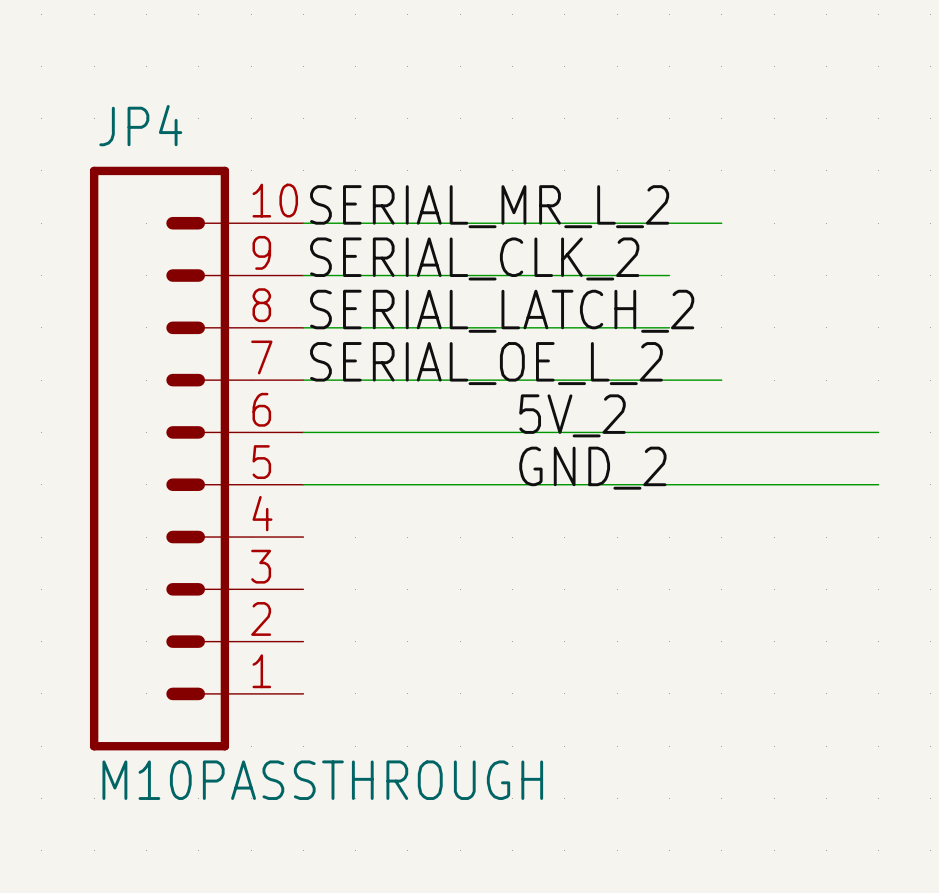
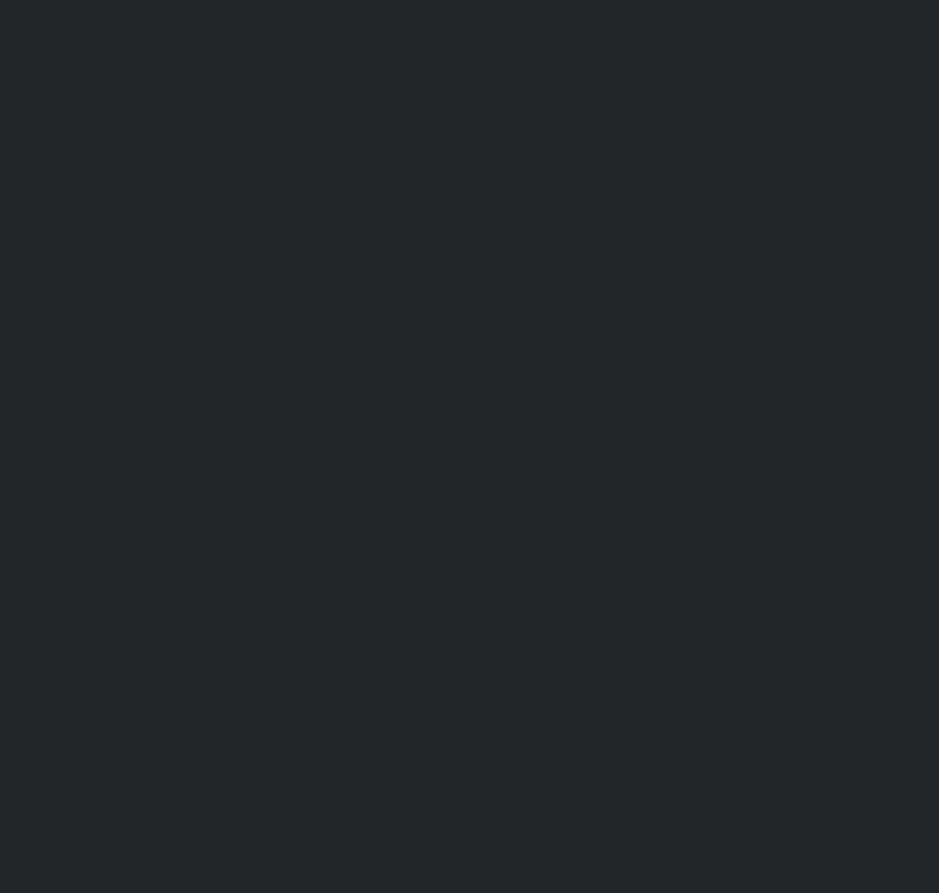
label: SERIAL_MR_L_2 (489, 206) -> none
wire: (303, 223) (721, 223) -> none
label: SERIAL_CLK_2 (474, 258) -> none
wire: (303, 275) (669, 275) -> none
label: SERIAL_LATCH_2 (502, 311) -> none
wire: (303, 327) (669, 327) -> none
label: SERIAL_OE_L_2 (486, 363) -> none
wire: (303, 380) (721, 380) -> none
label: 5V_2 (572, 415) -> none
wire: (303, 432) (878, 432) -> none
JP4: M10PASSTHROUGH (196, 458) -> none
label: GND_2 (592, 468) -> none
wire: (303, 484) (878, 484) -> none

